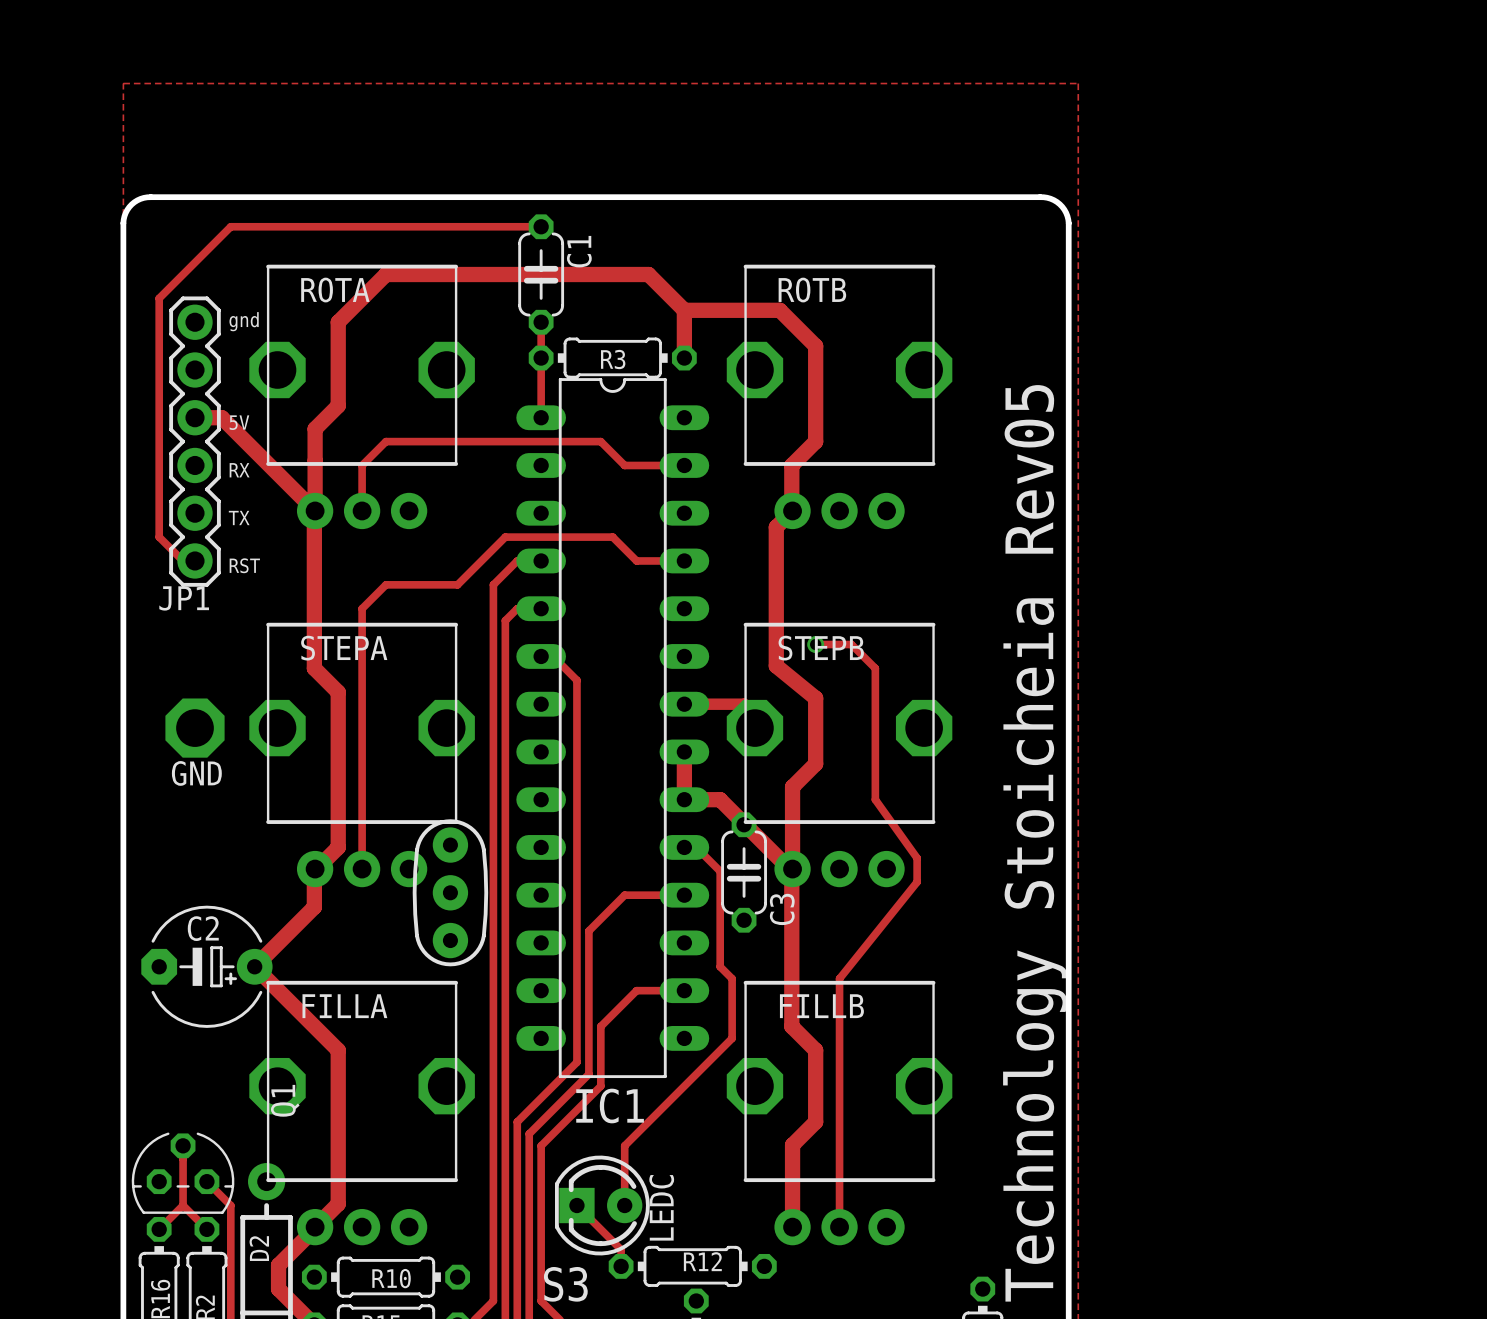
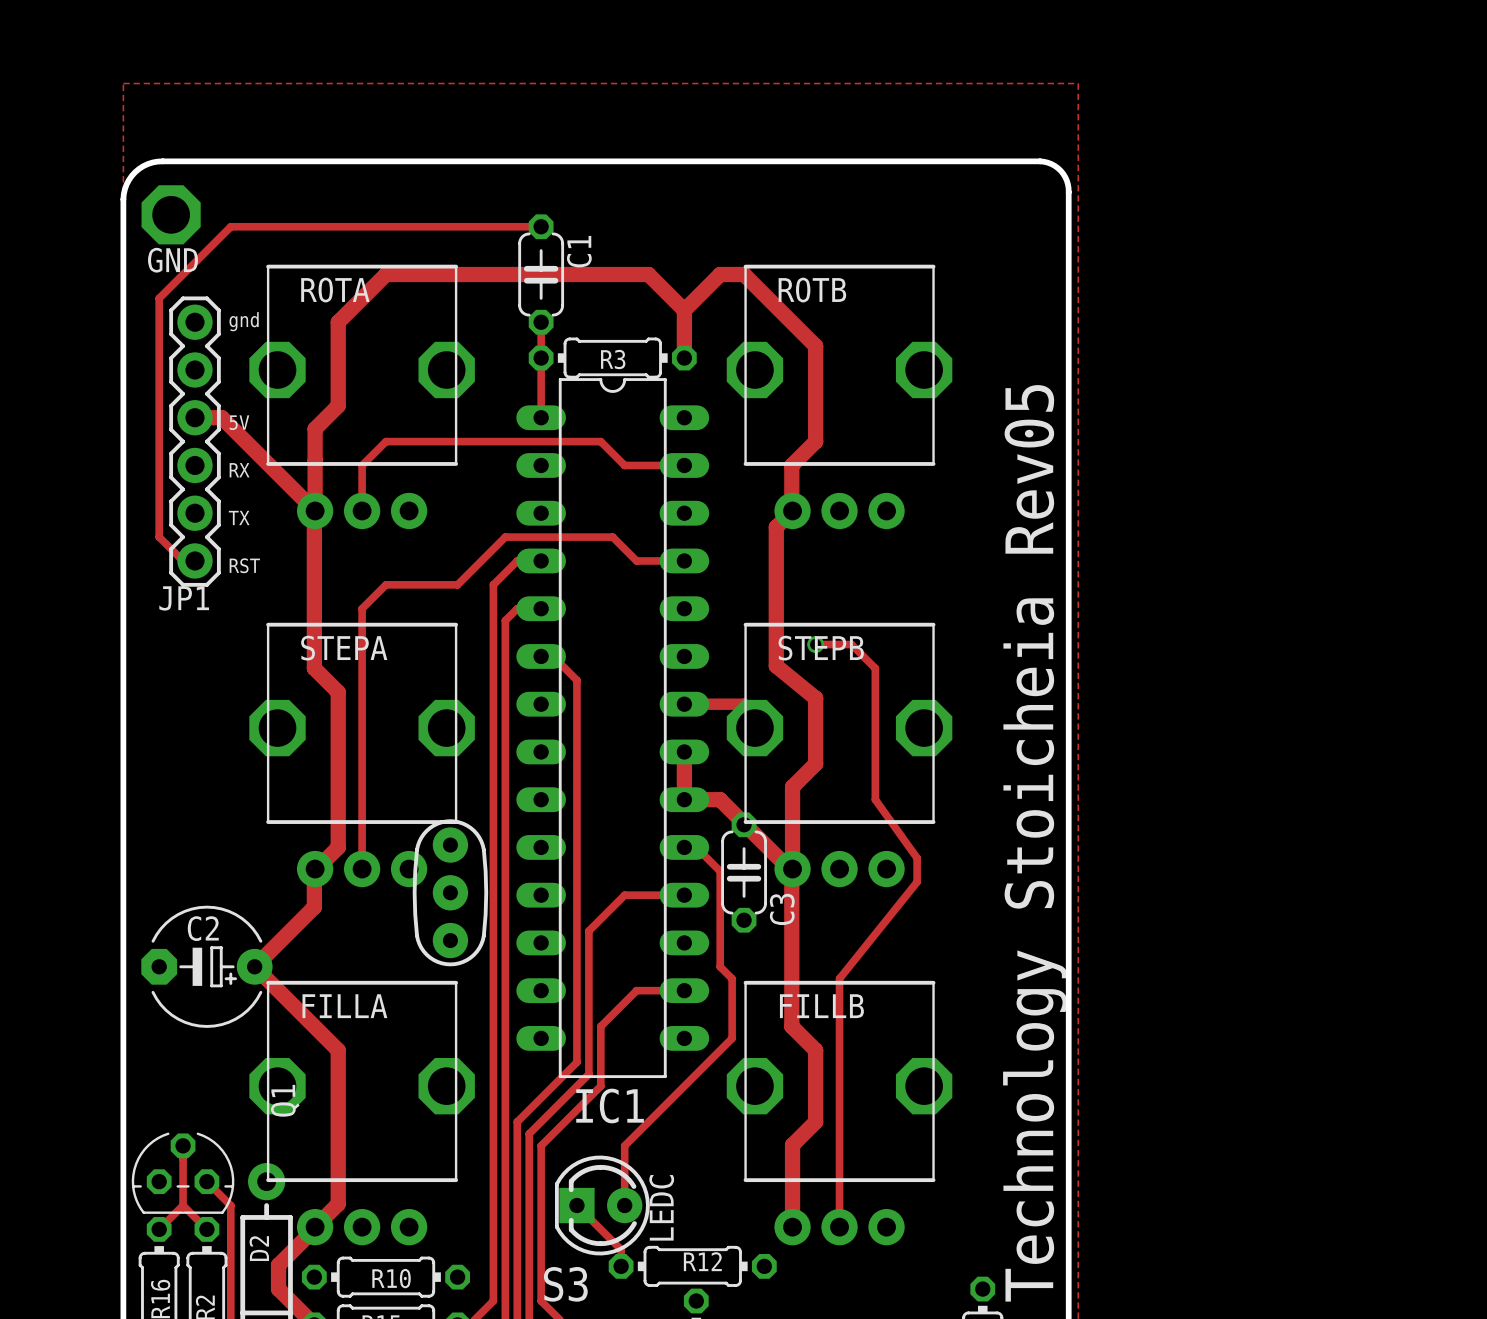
GND: none -> (171, 214)
board edge: (123, 223) (125, 213) (131, 204) (140, 198) (150, 197) (1043, 197) (1053, 200) (1062, 206) (1068, 223) -> (123, 223) (123, 194) (128, 180) (143, 166) (162, 161) (1040, 161) (1054, 165) (1065, 177) (1068, 188) (1068, 223)
track: (684, 310) (779, 310) -> (684, 310) (720, 274) (744, 274) (779, 310)
GND: (195, 728) -> none

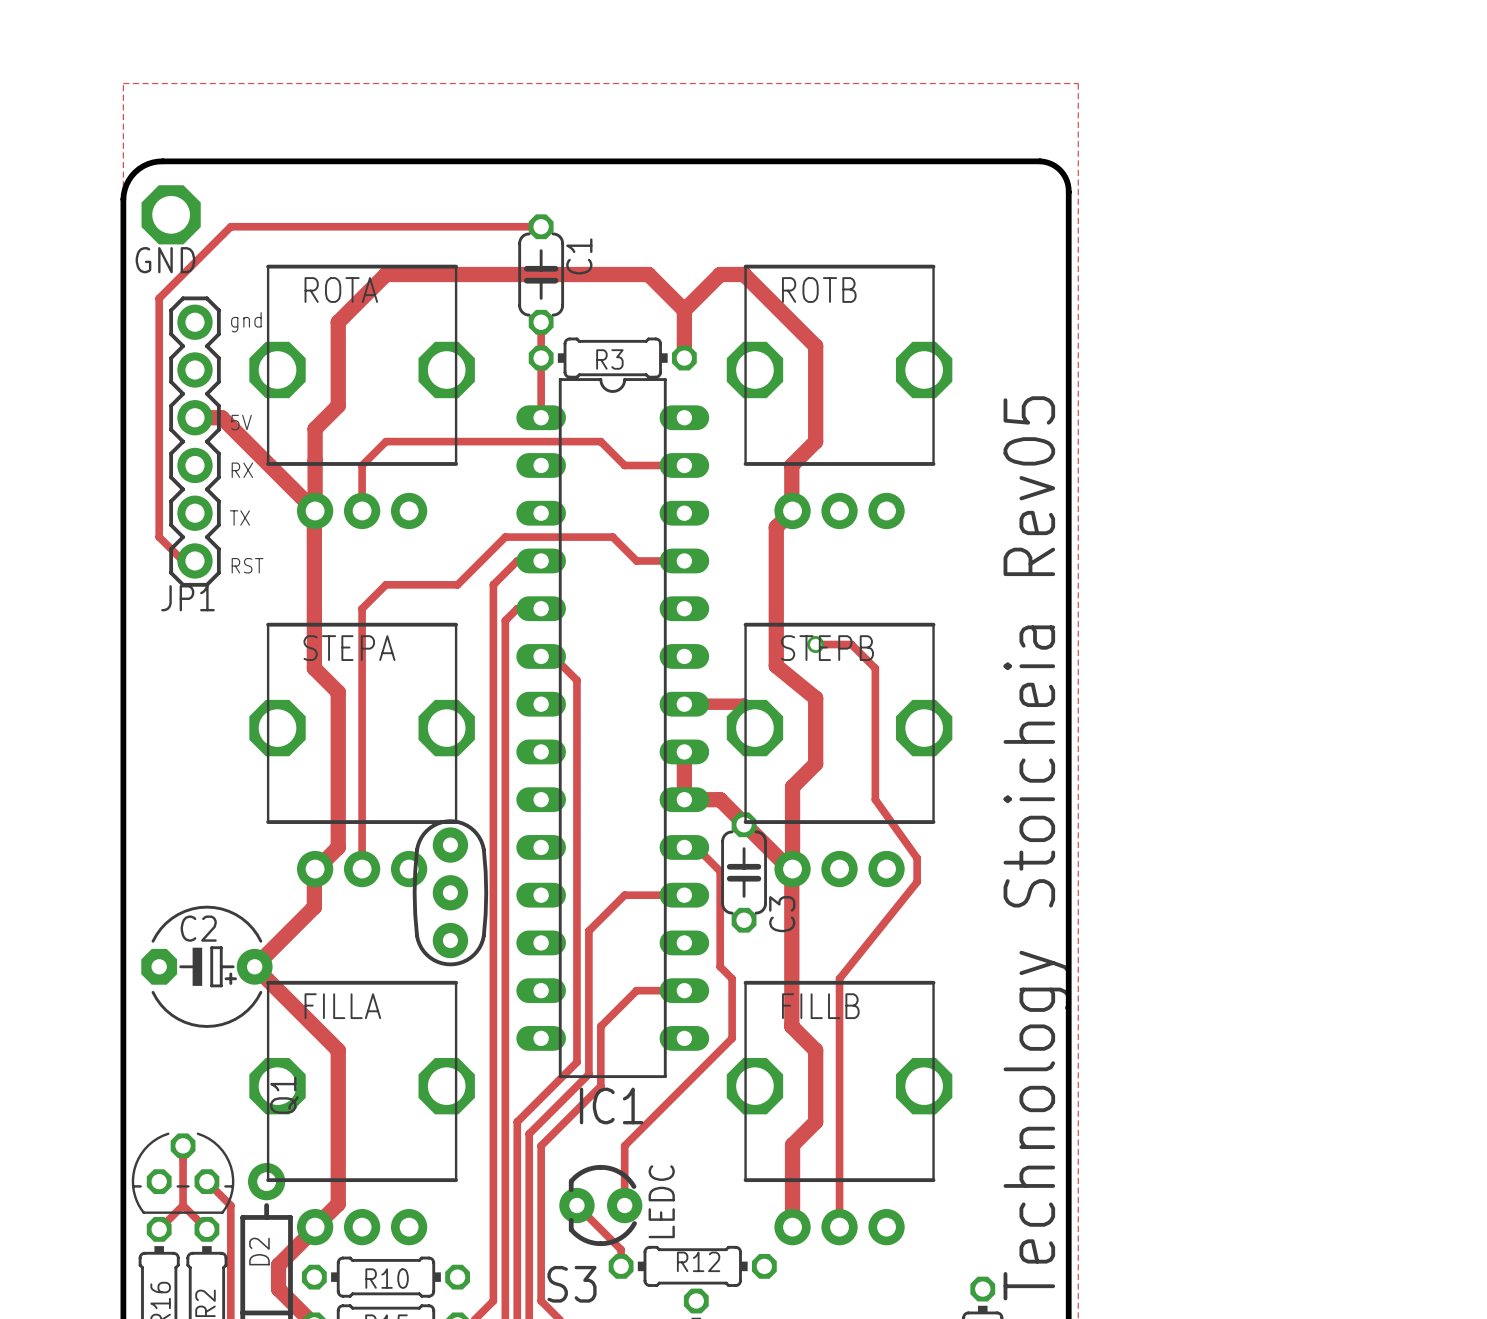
LEDC footprint: [554, 1155, 650, 1256] -> [559, 1164, 643, 1247]

